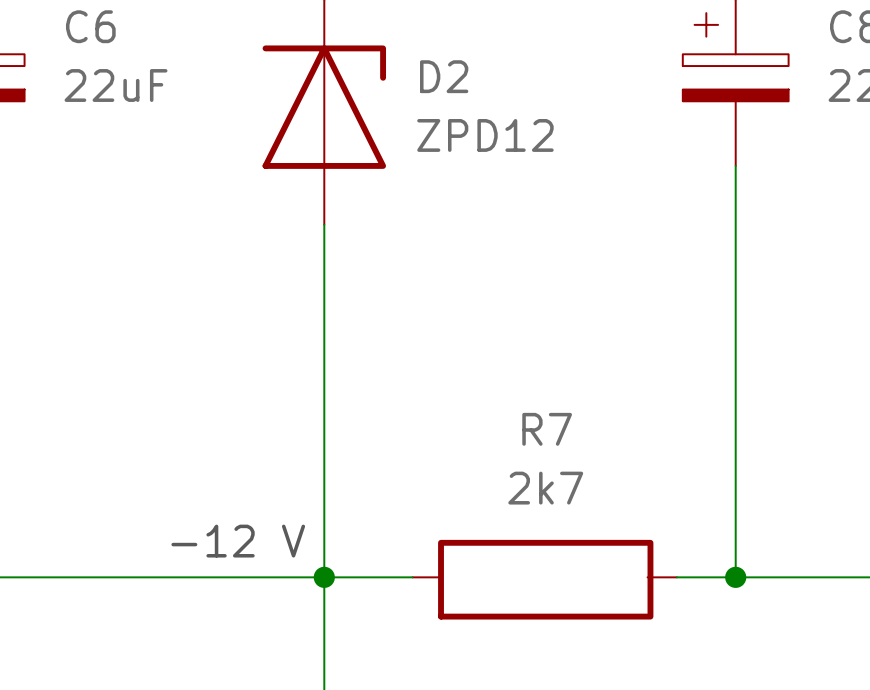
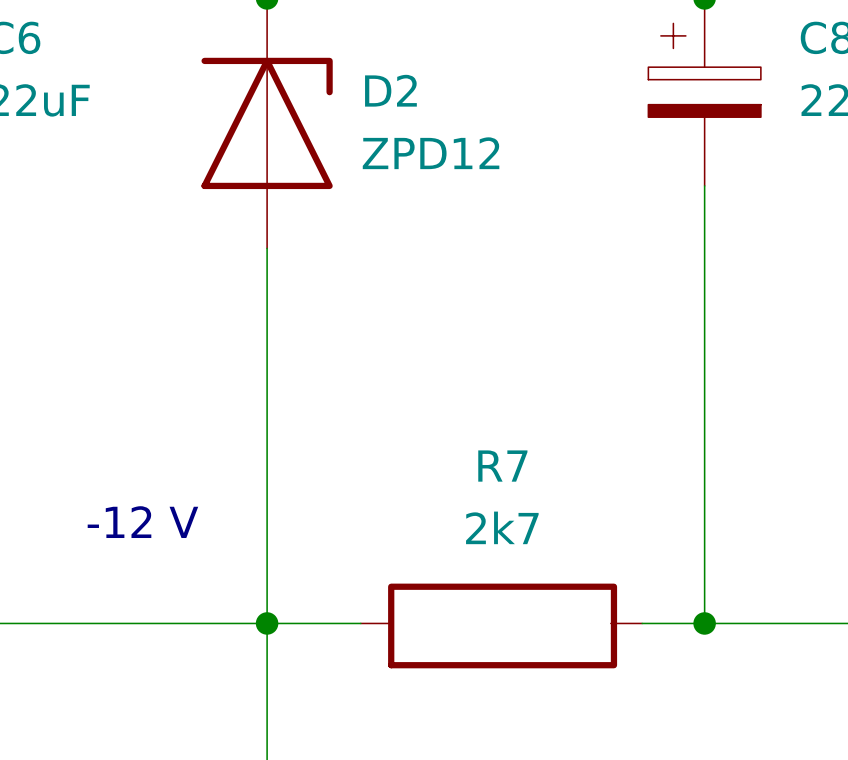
text position: -12 V (238, 541) -> -12 V (142, 522)

